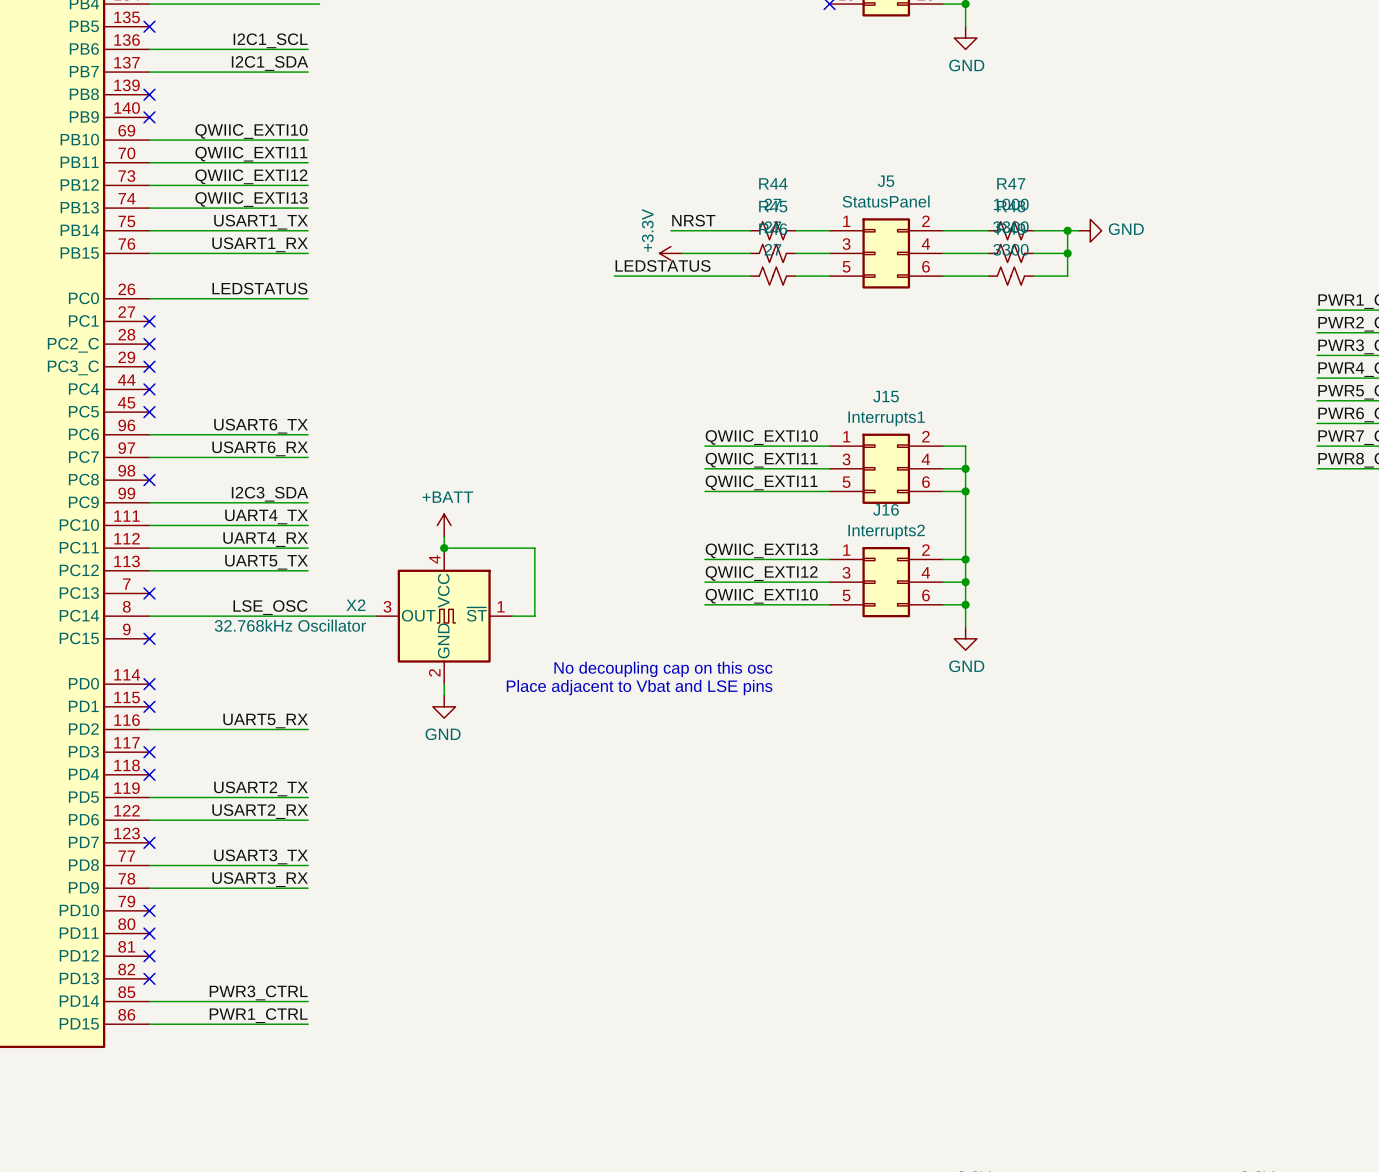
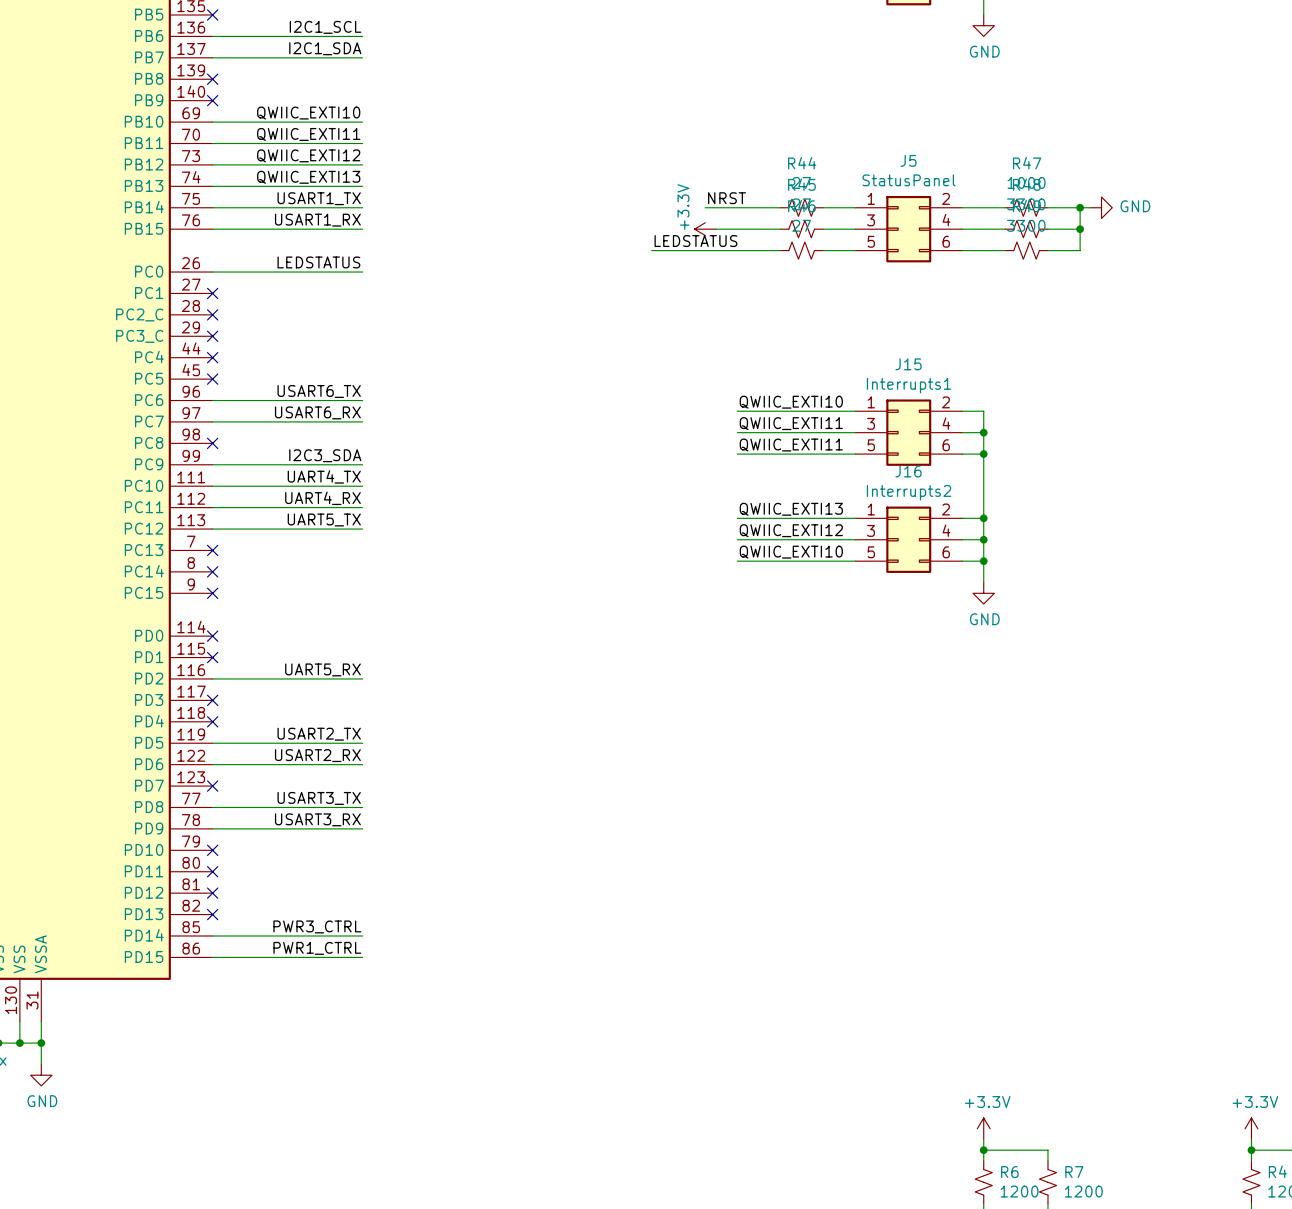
power symbol: +BATT (444, 525) -> none
wire: (444, 536) (444, 548) (534, 548) (534, 616) (512, 616) -> none
junction: (444, 548) -> none
label: LSE_OSC (270, 607) -> none
wire: (149, 616) (376, 616) -> none
no-connect mark: none -> (212, 571)
X2: 32.768kHz Oscillator (444, 616) -> none
text: No decoupling cap on this osc (663, 669) -> none
wire: (444, 684) (444, 695) -> none
text: Place adjacent to Vbat and LSE pins (639, 687) -> none
power symbol: GND (444, 706) -> none

